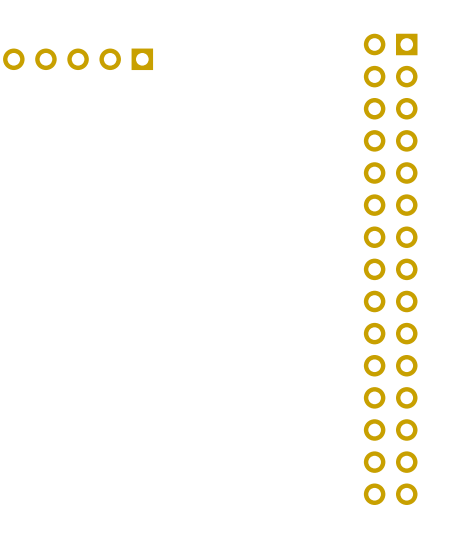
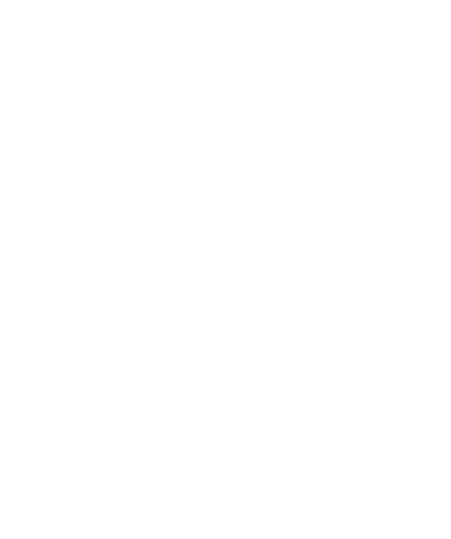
part: (78, 59) -> none
part: (390, 269) -> none

